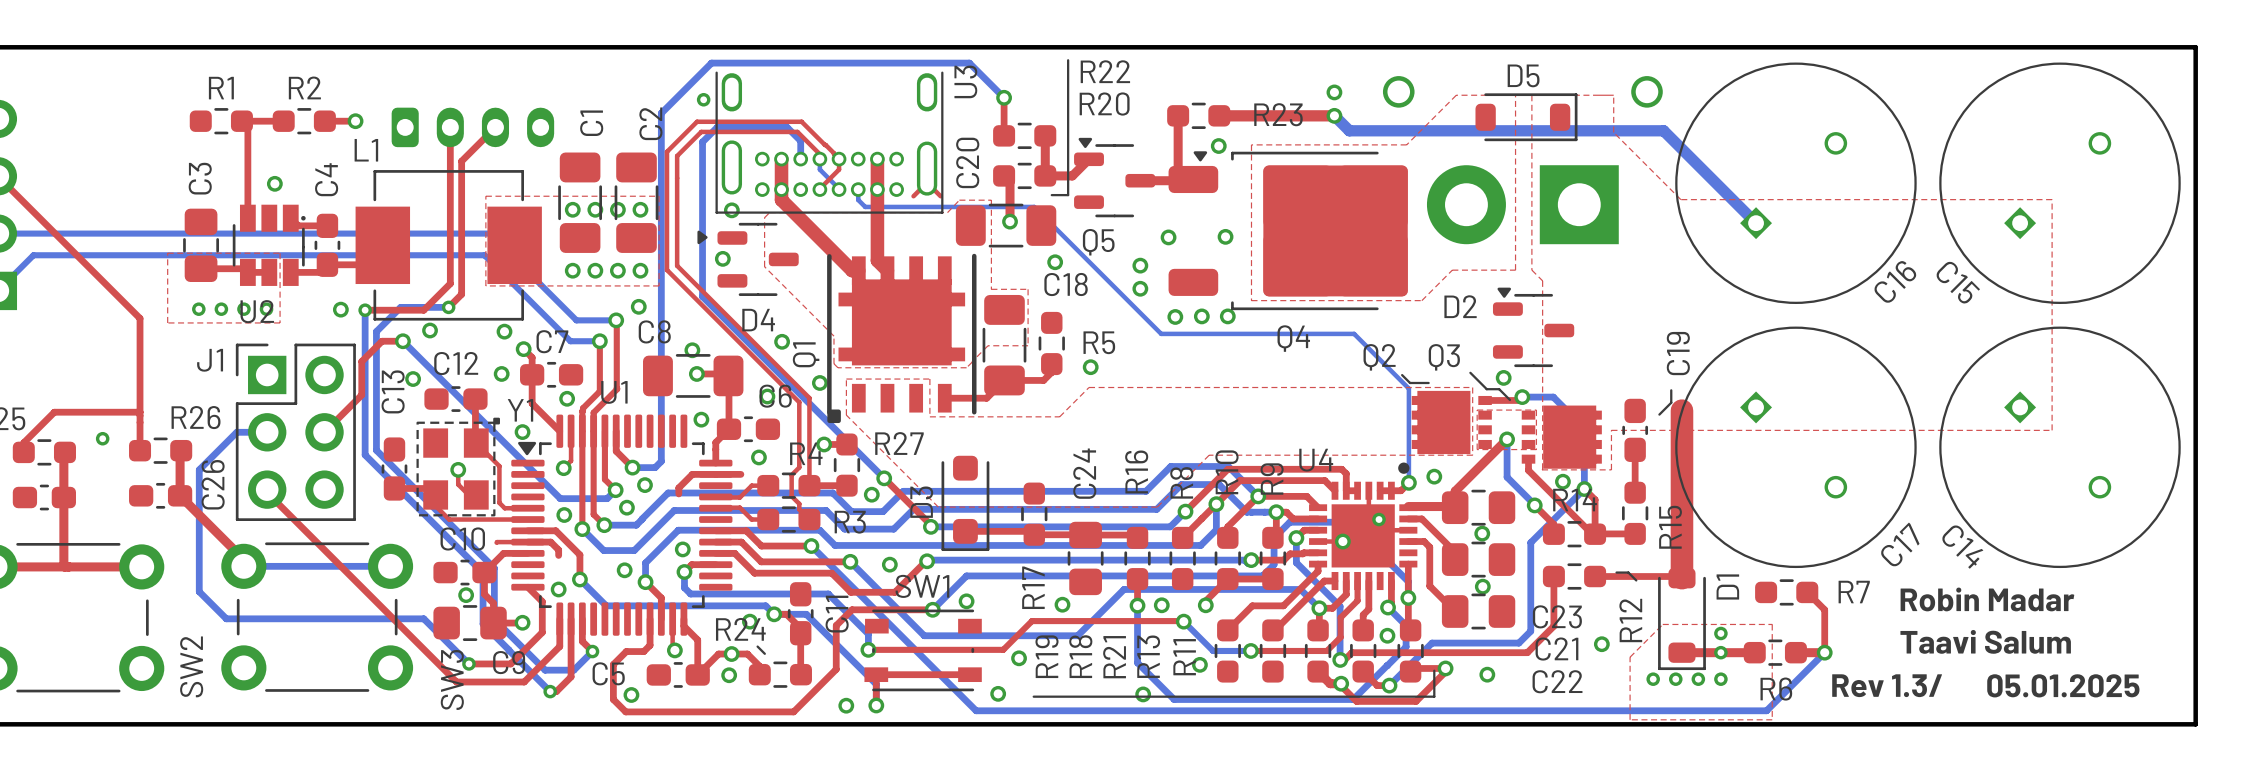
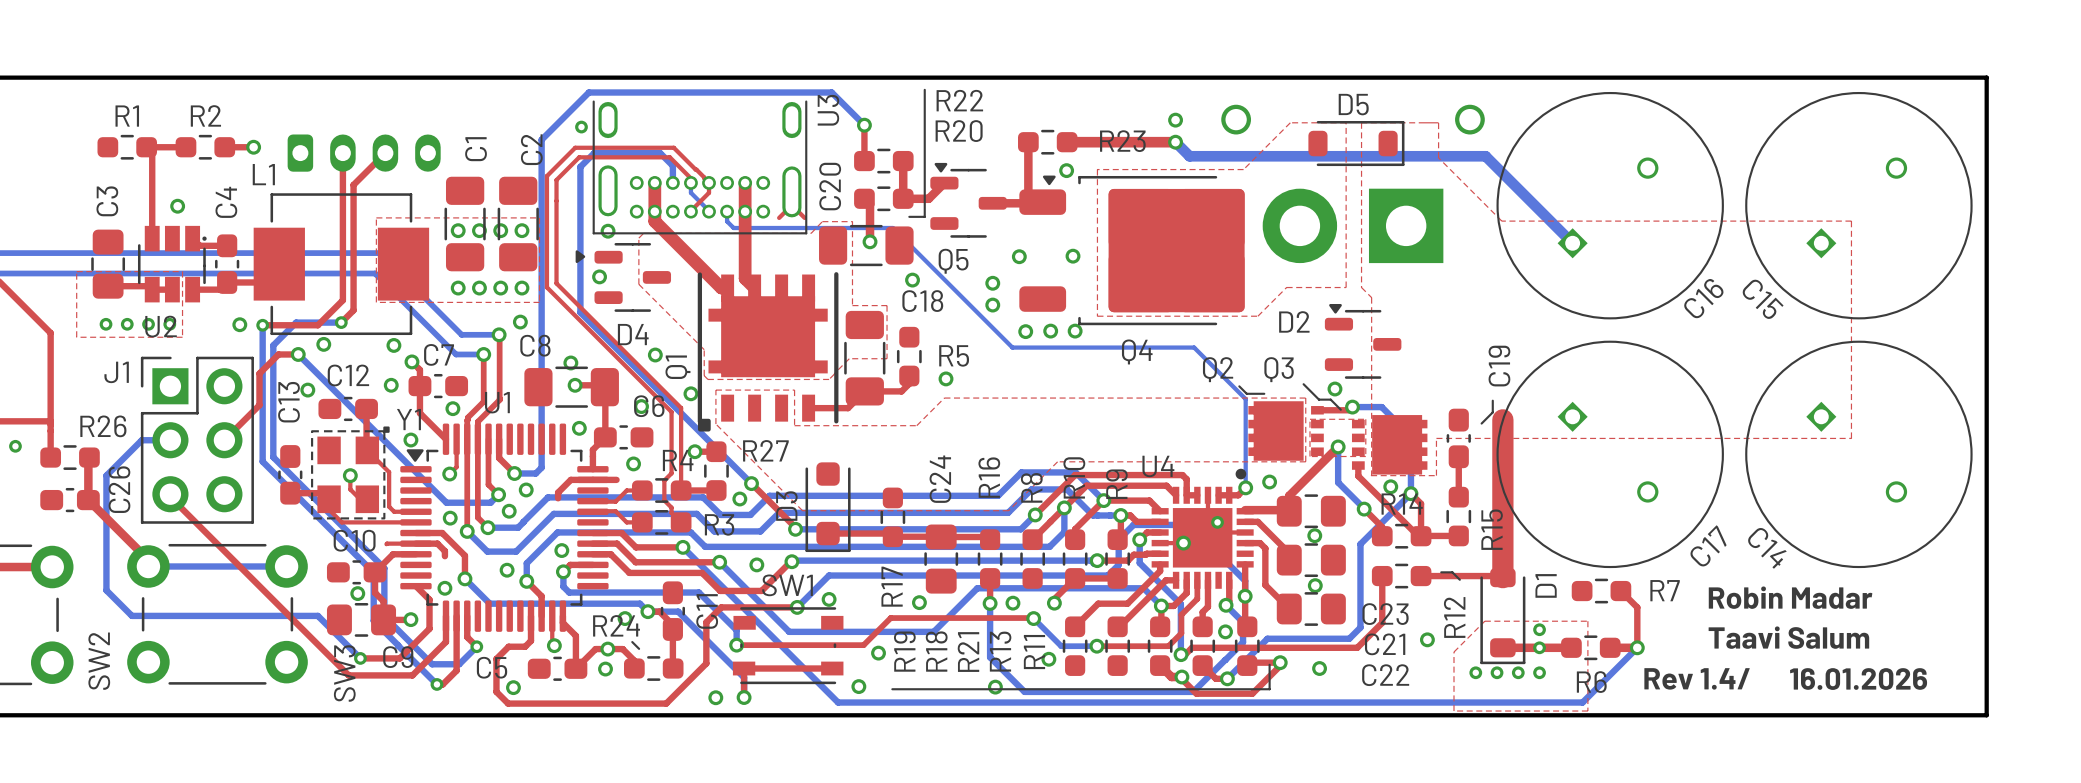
text: Rev 1.3/ (1887, 685) -> Rev 1.4/ (1697, 678)
text: 05.01.2025 (2063, 685) -> 16.01.2026 (1858, 679)

